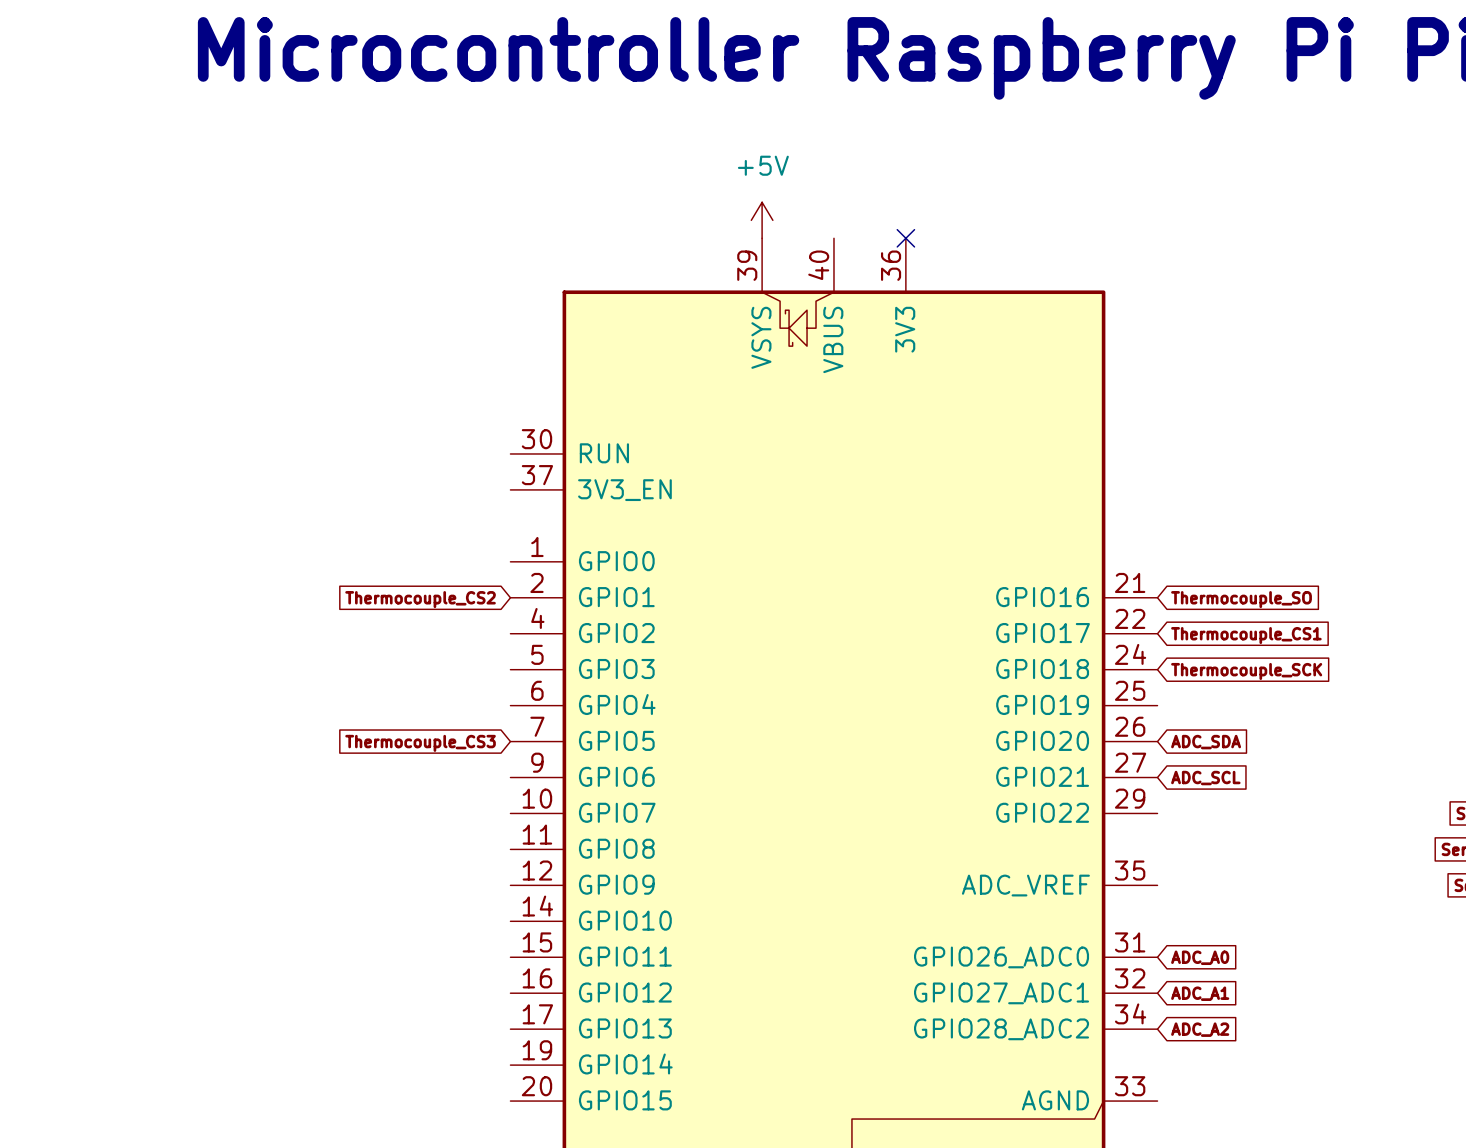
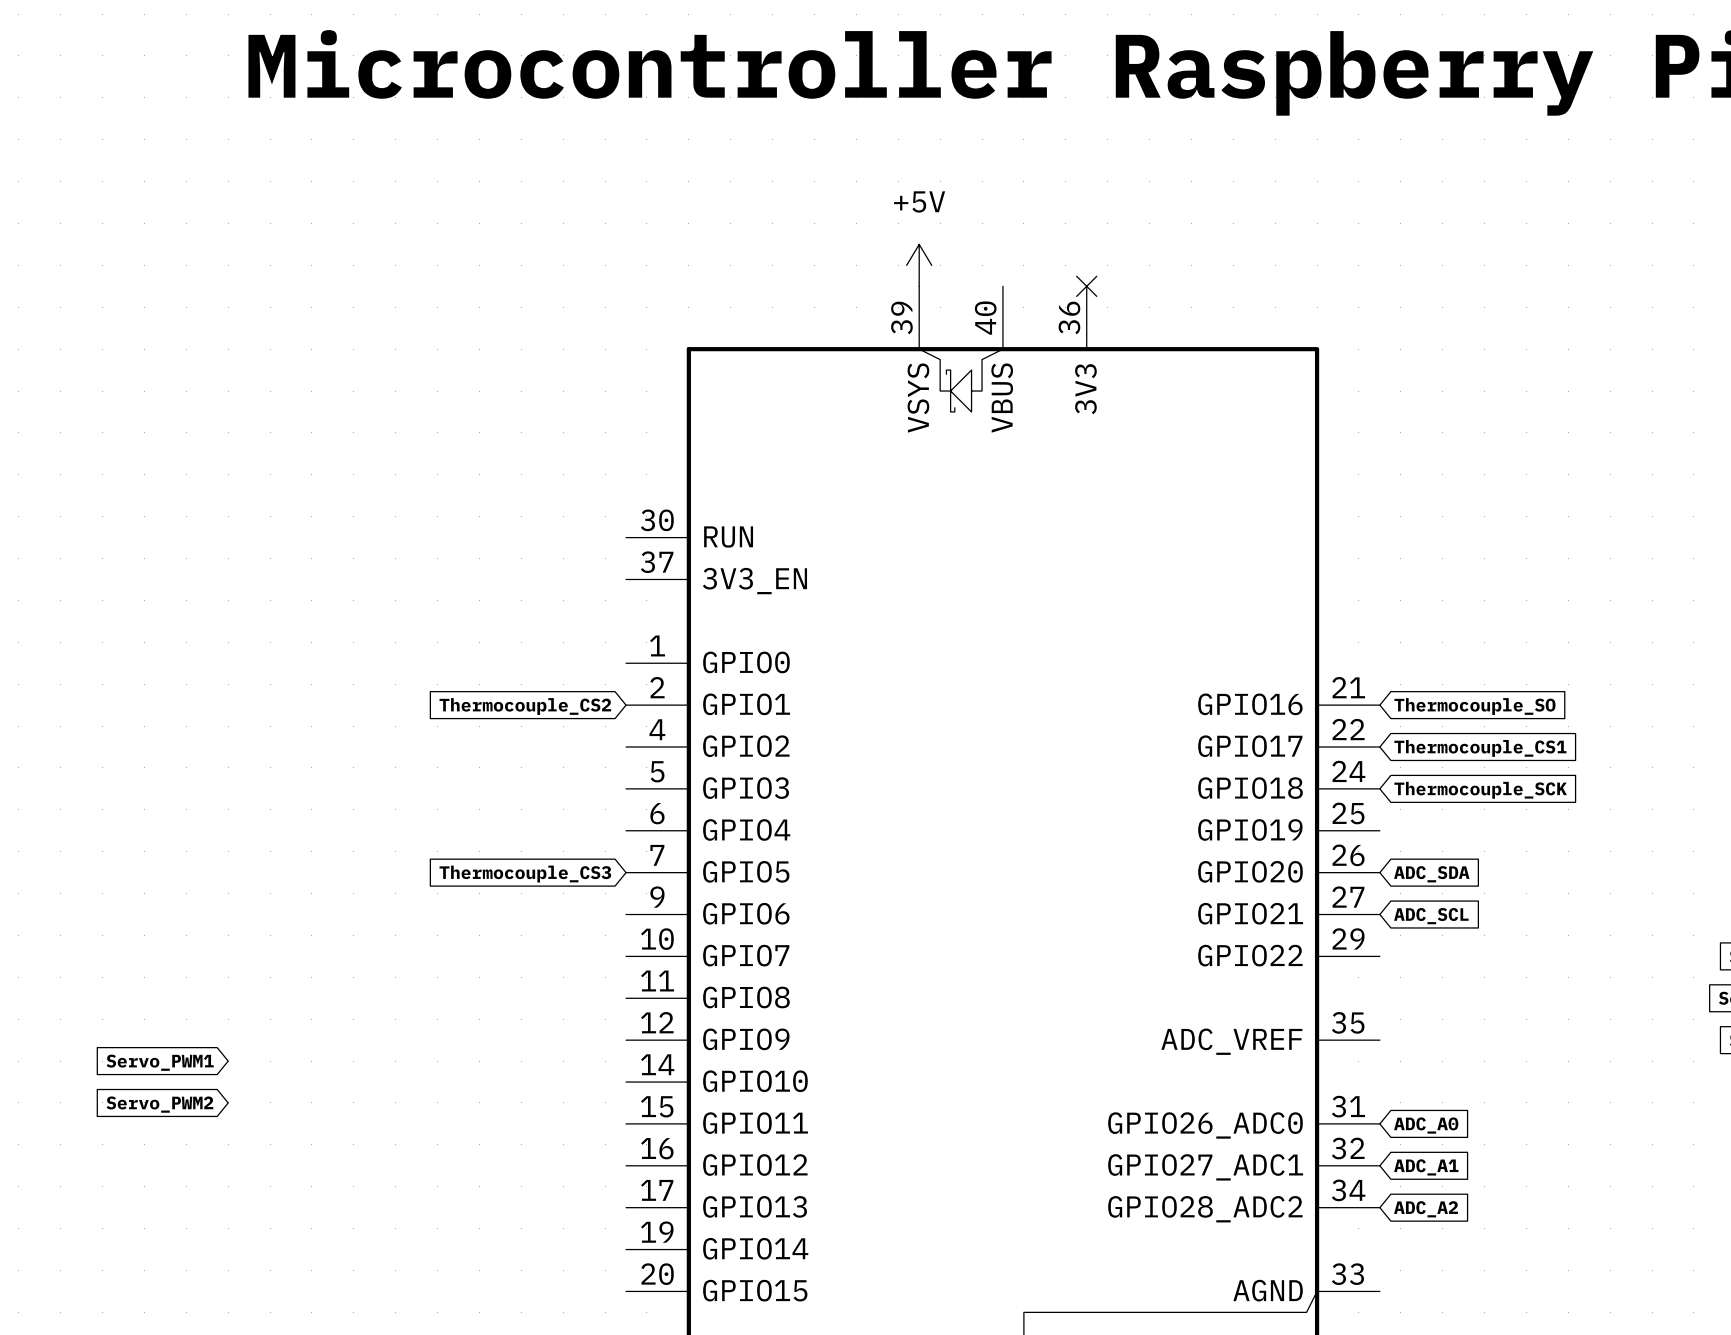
global label: none -> Servo_PWM1 (160, 1062)
global label: none -> Servo_PWM2 (159, 1104)

